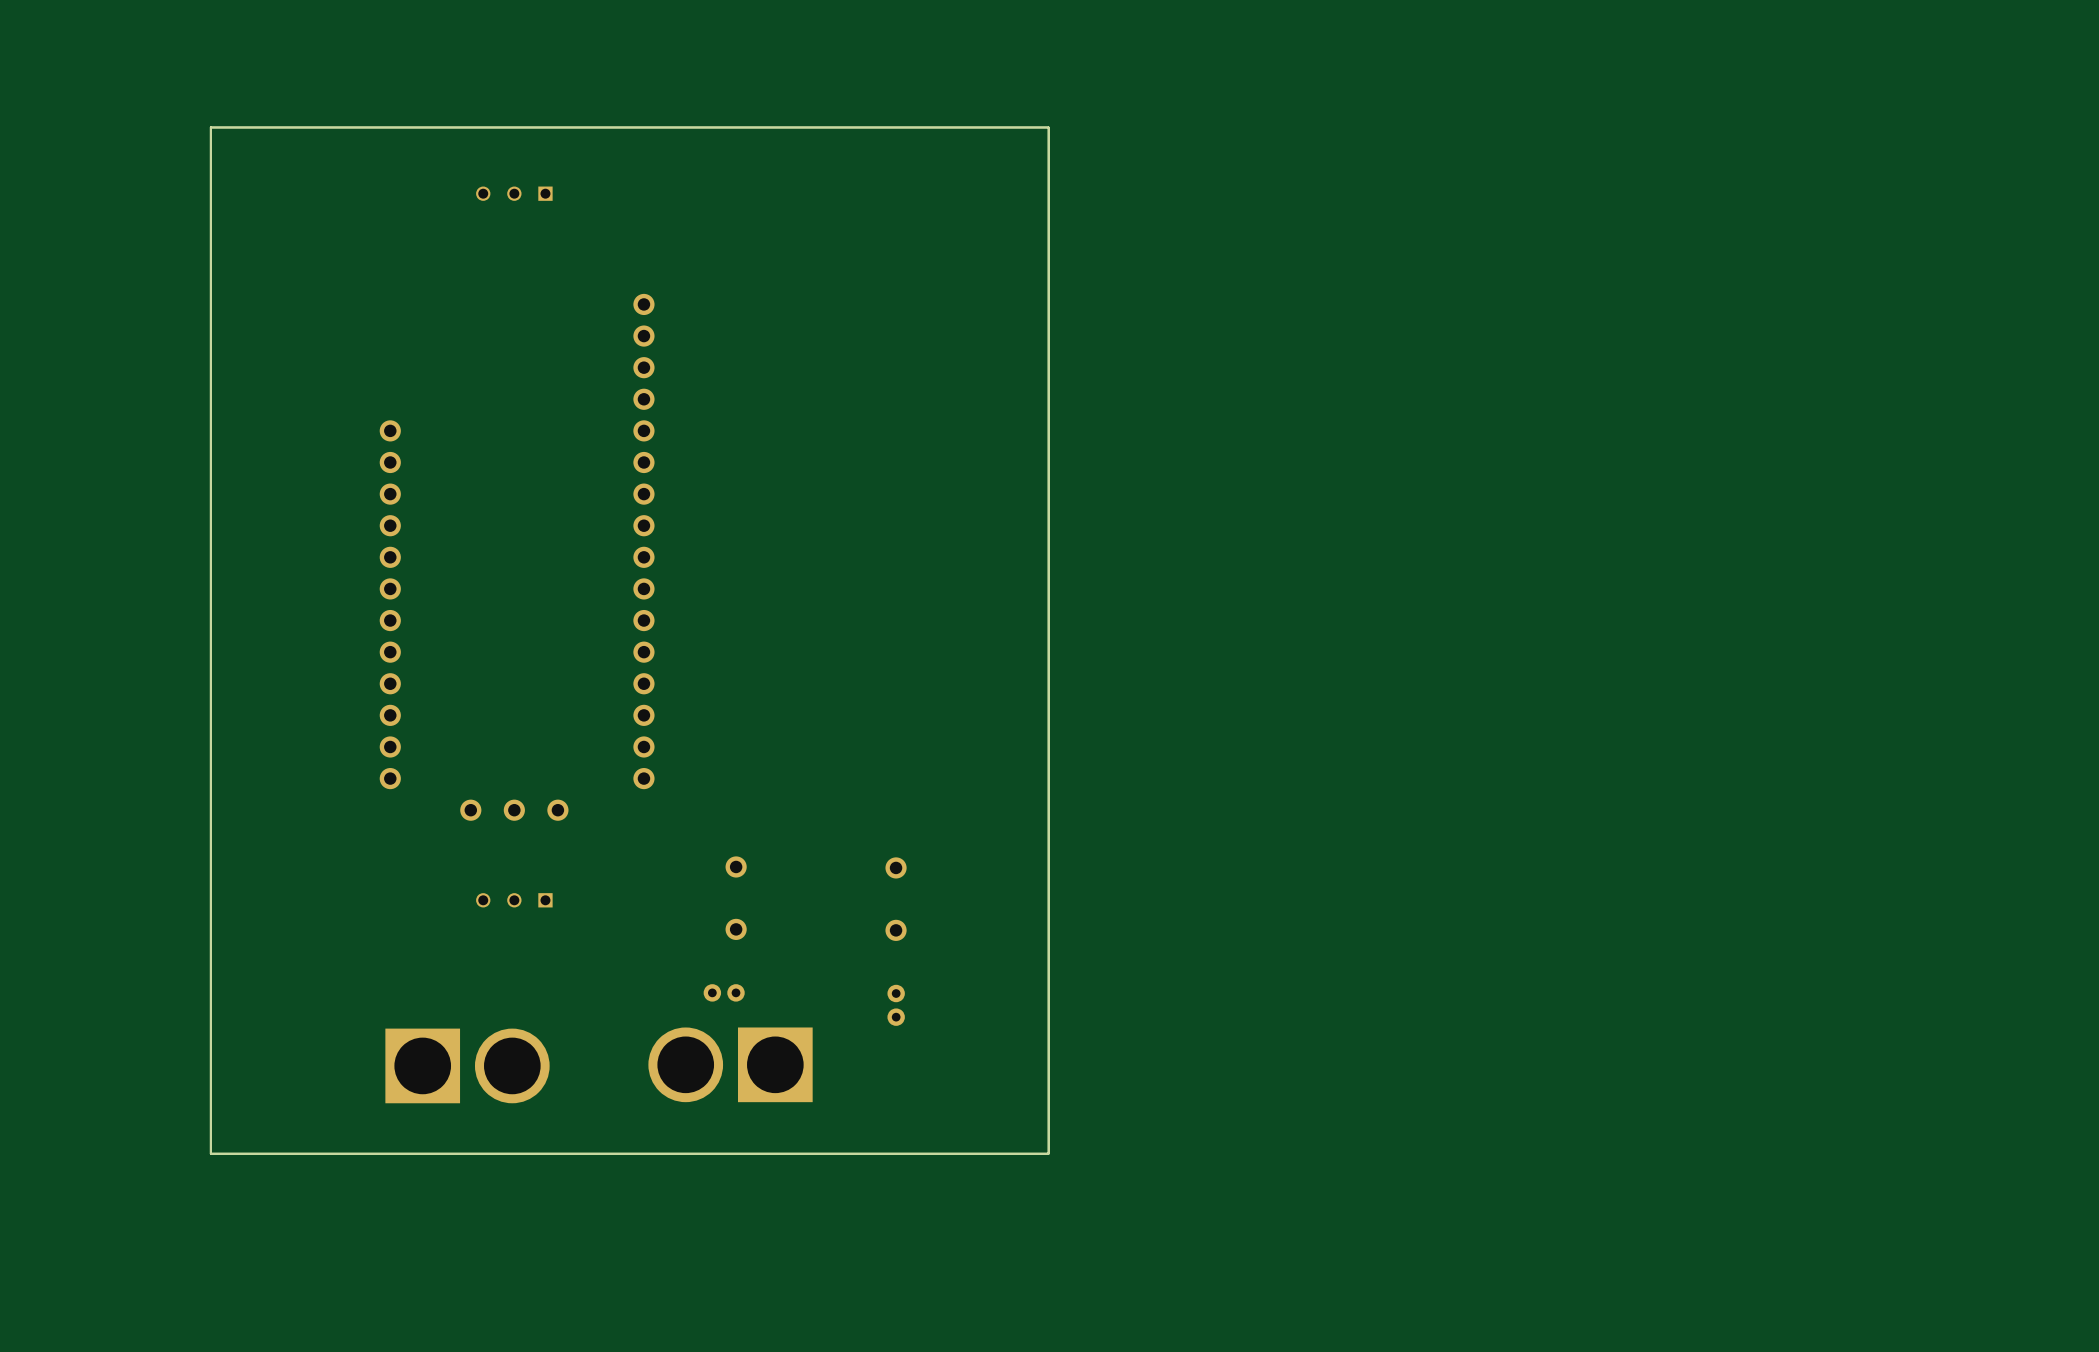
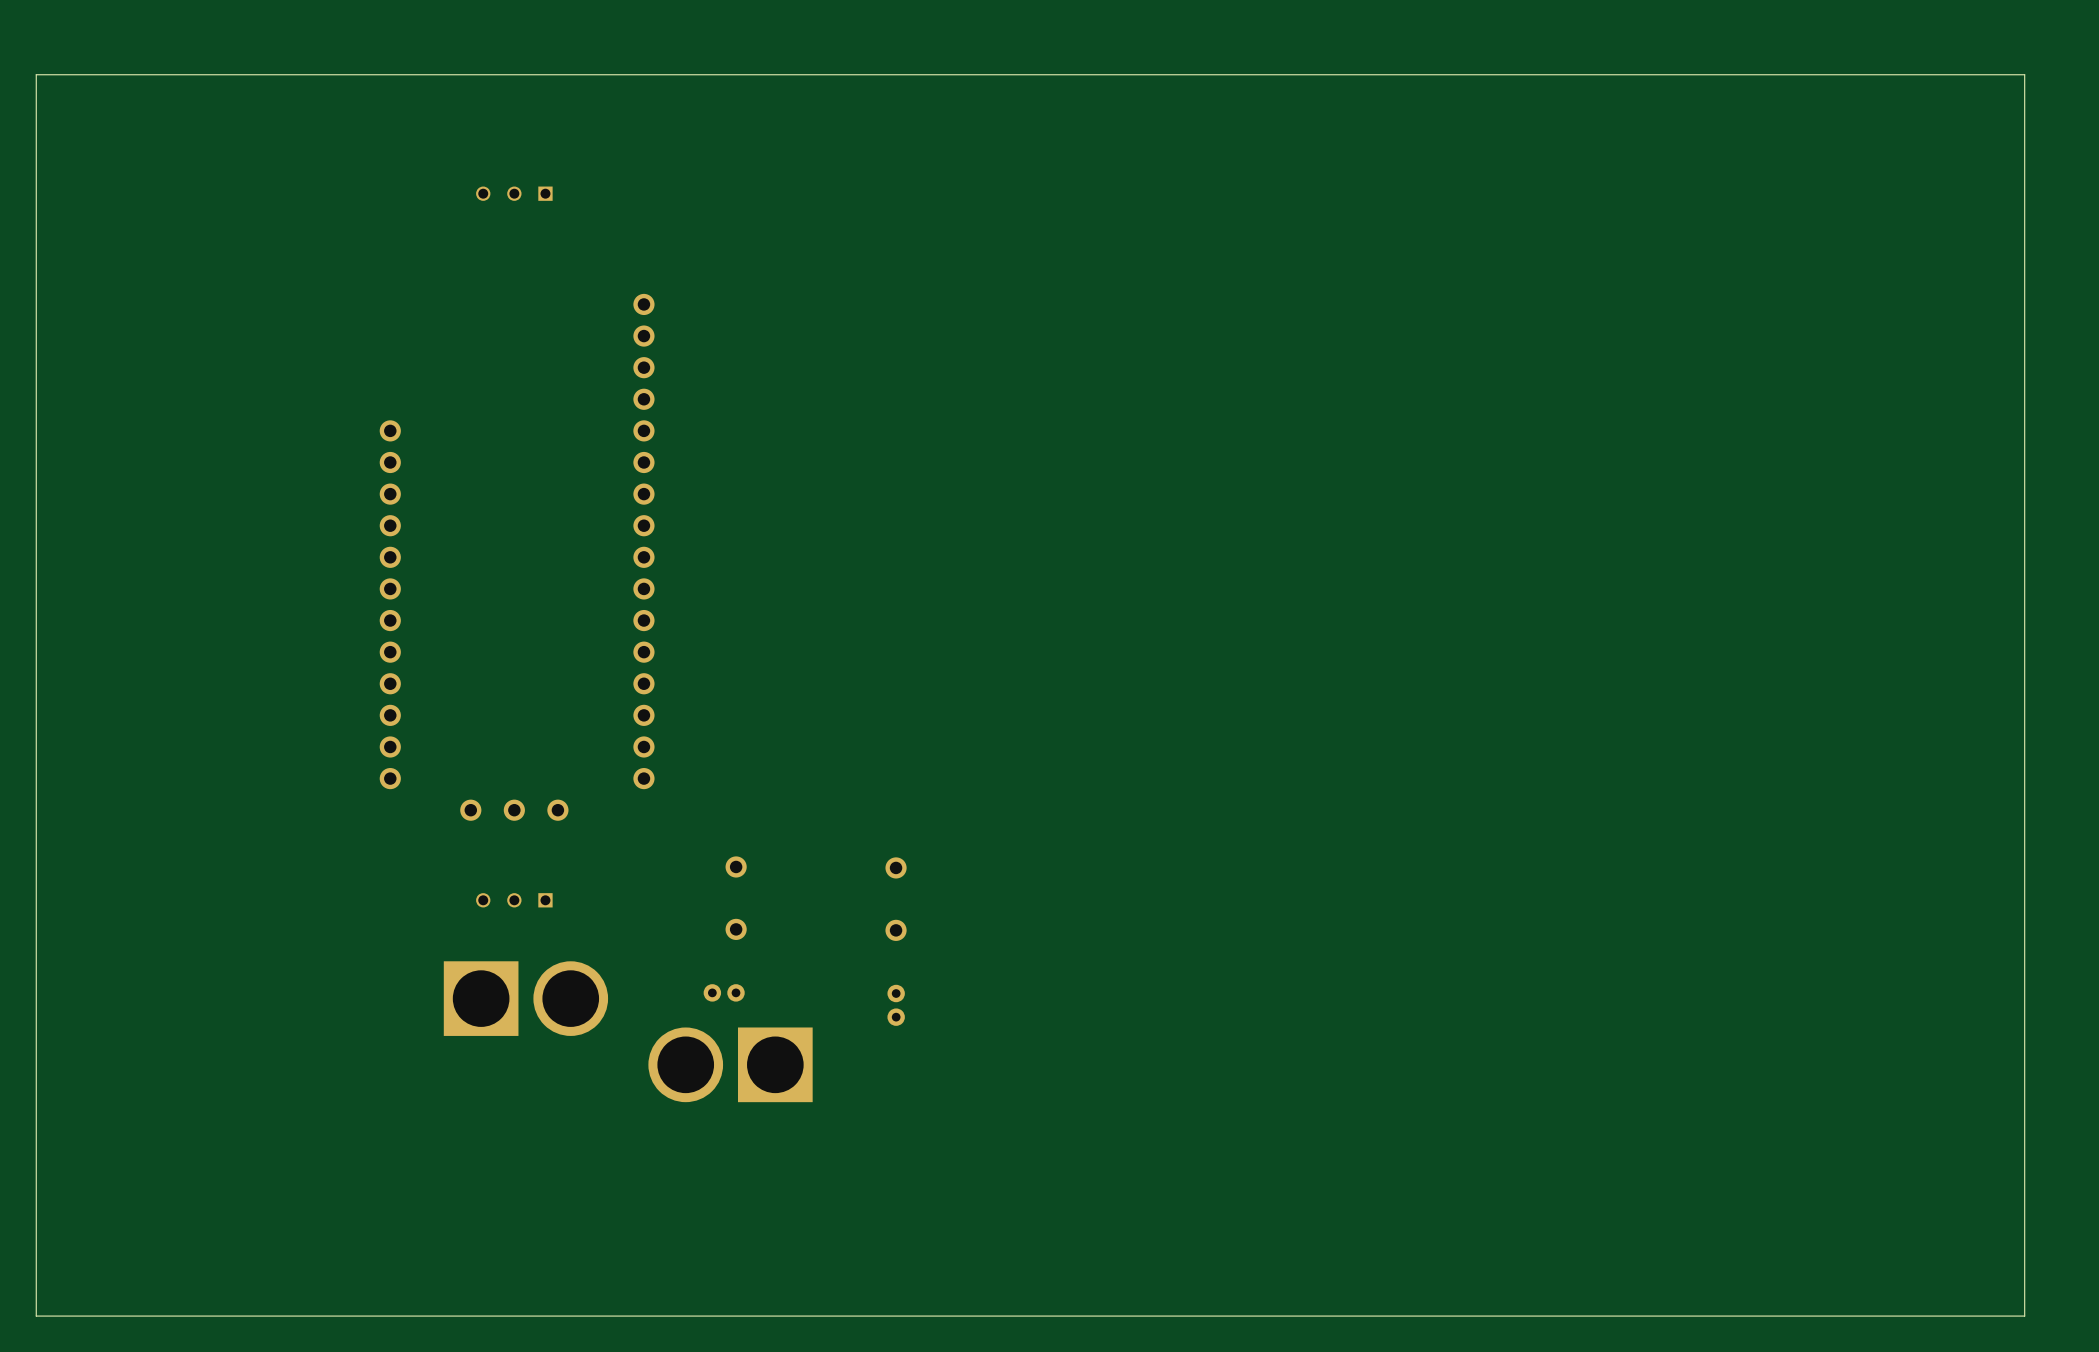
board edge: none -> (2024, 74) (36, 74) (36, 1316) (2024, 1316) (2024, 74)
board edge: (1048, 127) (210, 127) (210, 1153) (1048, 1153) (1048, 127) -> none
part position: (467, 1065) -> (525, 998)

